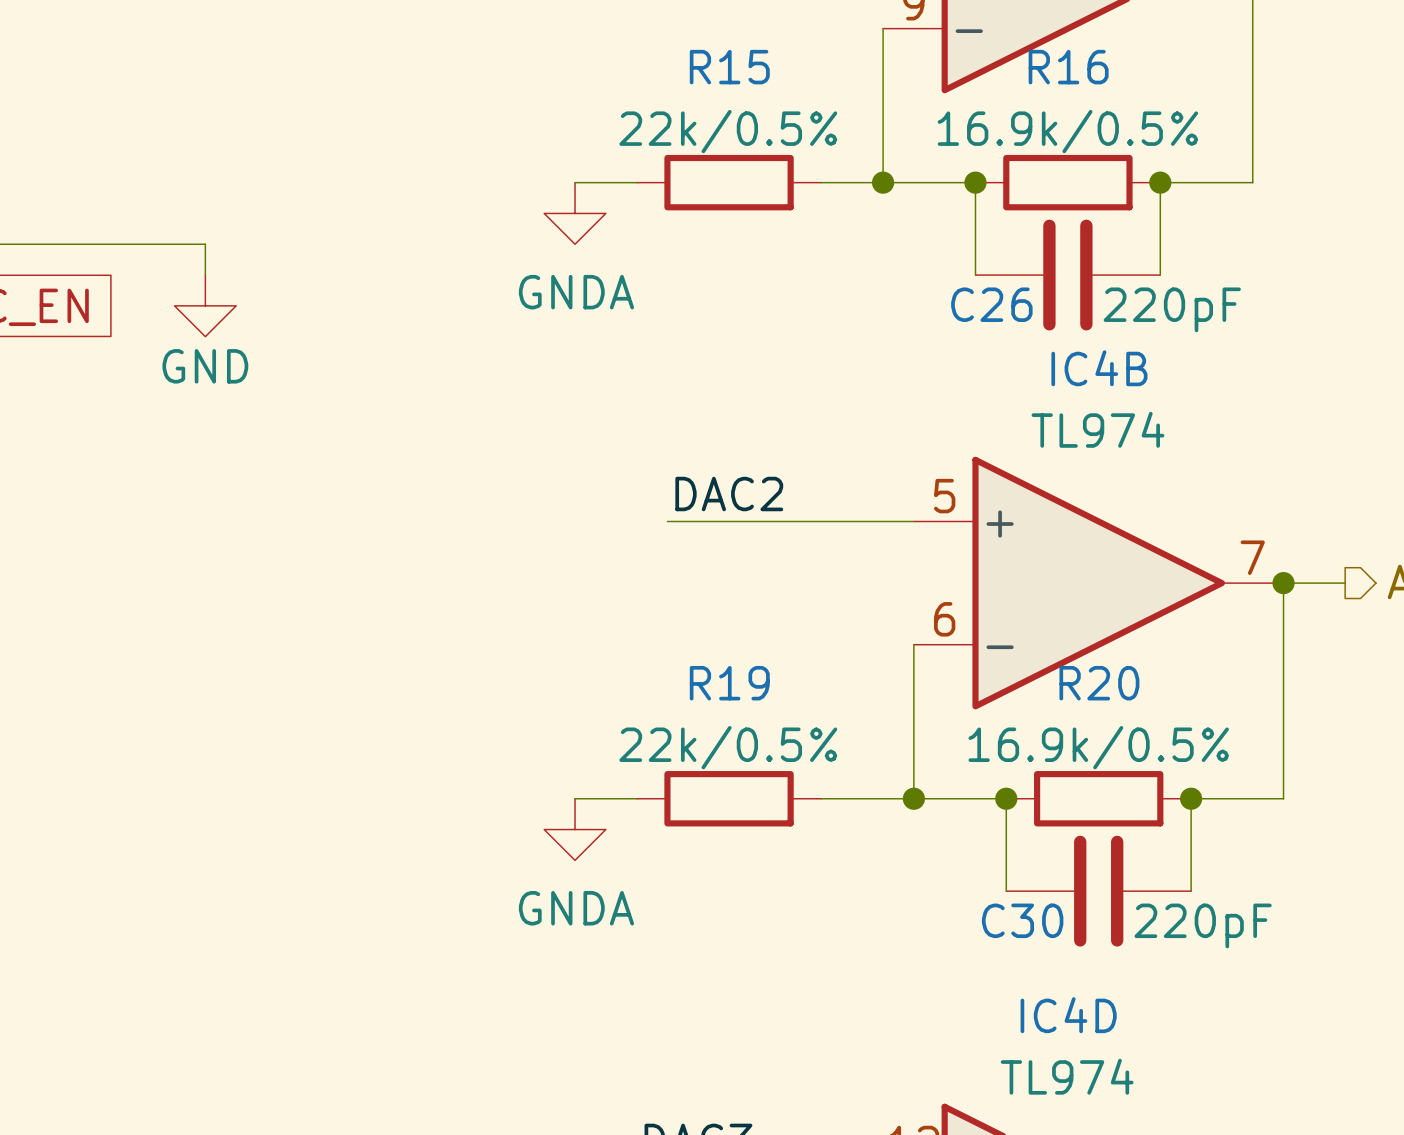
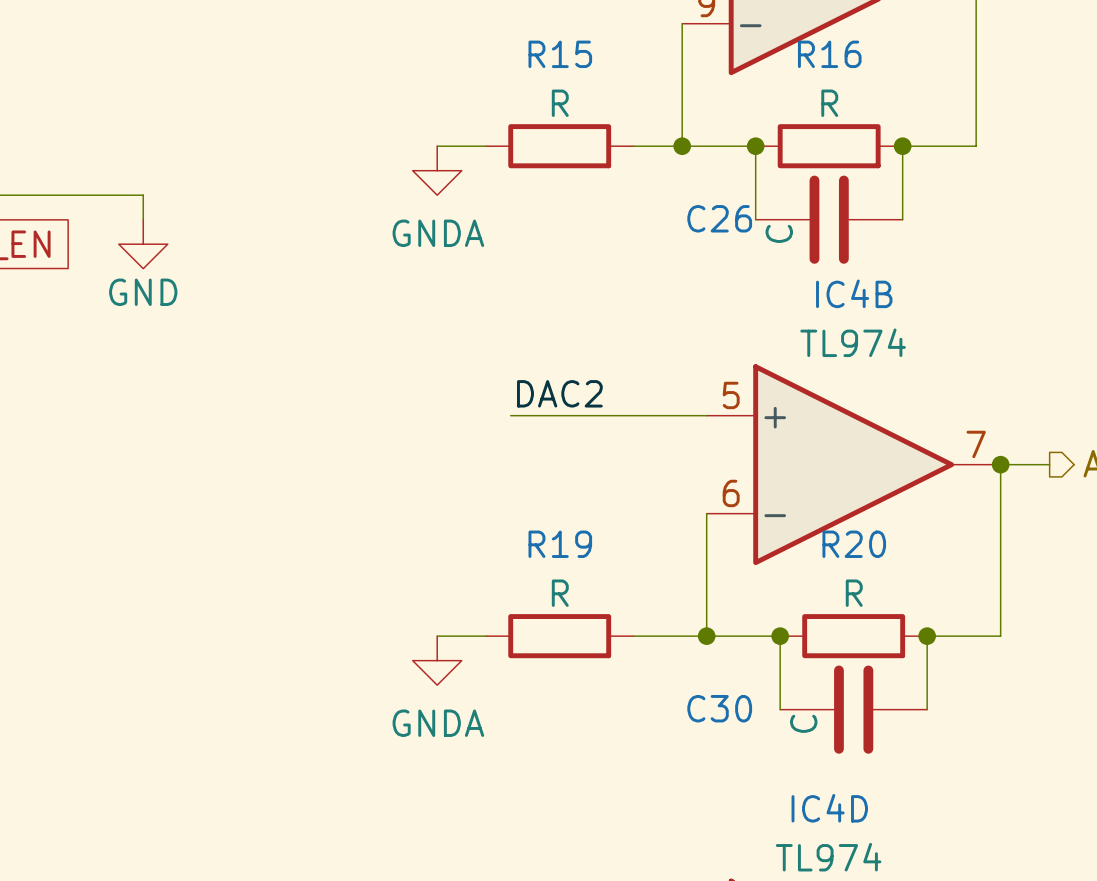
R15 value: 22k/0.5% (728, 131) -> R (560, 103)
R16 value: 16.9k/0.5% (1067, 131) -> R (829, 103)
C26 name position: C26 (991, 304) -> C26 (719, 218)
C26 value: 220pF (1172, 309) -> C (779, 233)
R19 value: 22k/0.5% (728, 747) -> R (560, 593)
R20 value: 16.9k/0.5% (1098, 747) -> R (854, 593)
C30 name position: C30 (1022, 920) -> C30 (719, 708)
C30 value: 220pF (1203, 925) -> C (803, 723)

